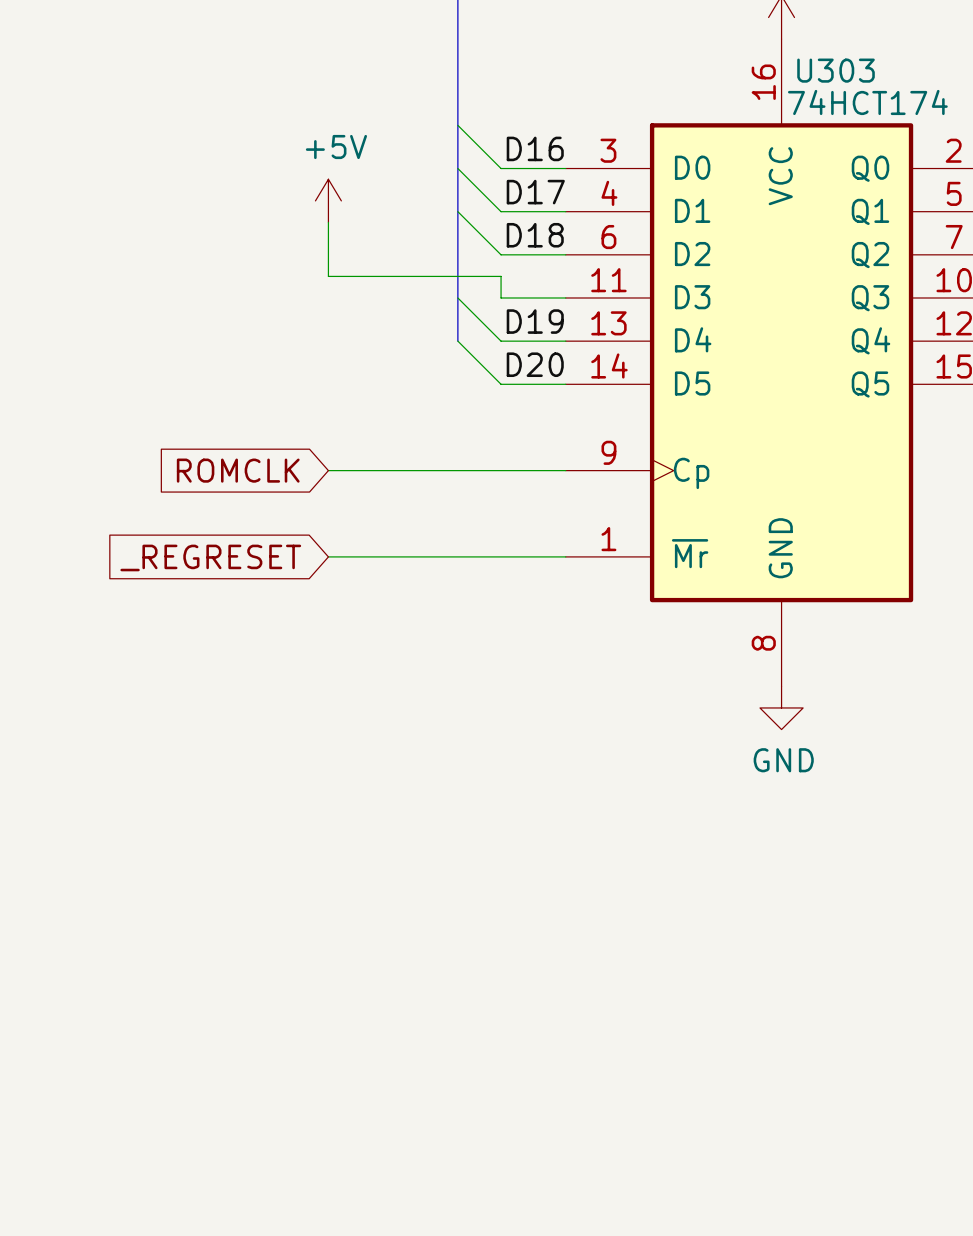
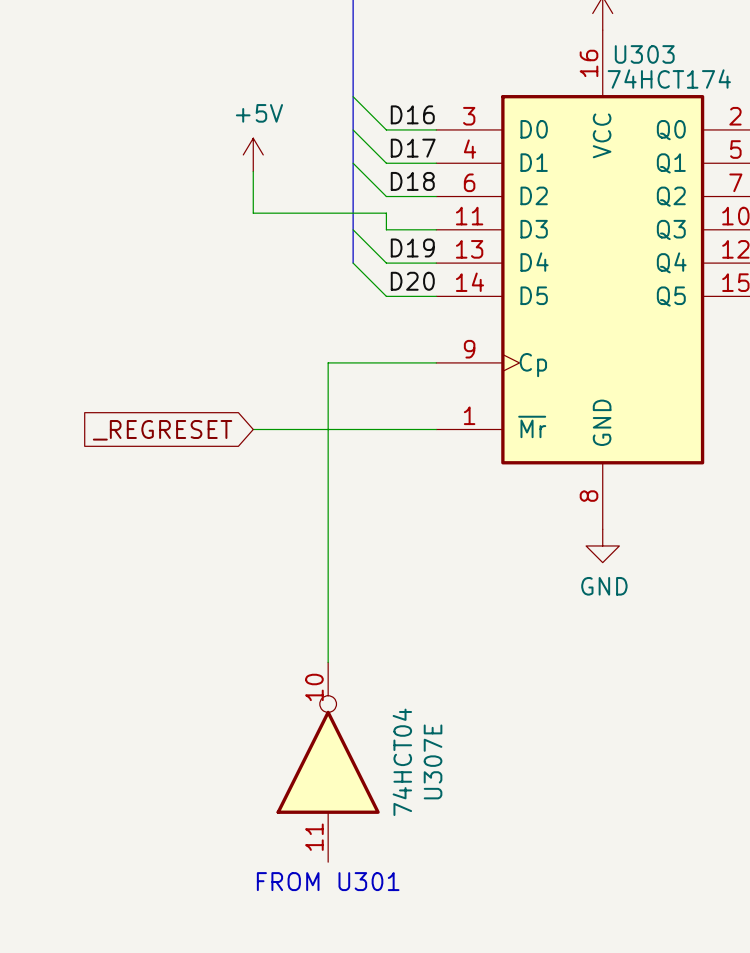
global label: ROMCLK (238, 470) -> none
wire: (328, 470) (425, 470) -> (328, 662) (328, 362)
U307E: none -> 74HCT04 (328, 762)
text: none -> FROM U301 (328, 881)

